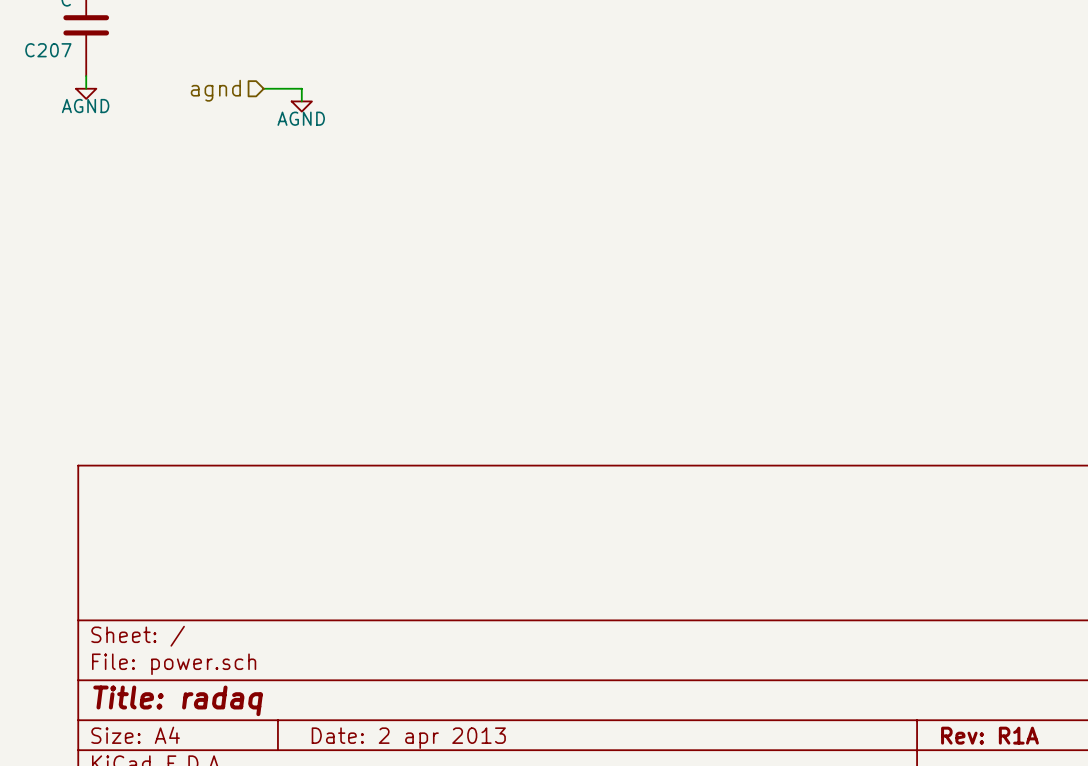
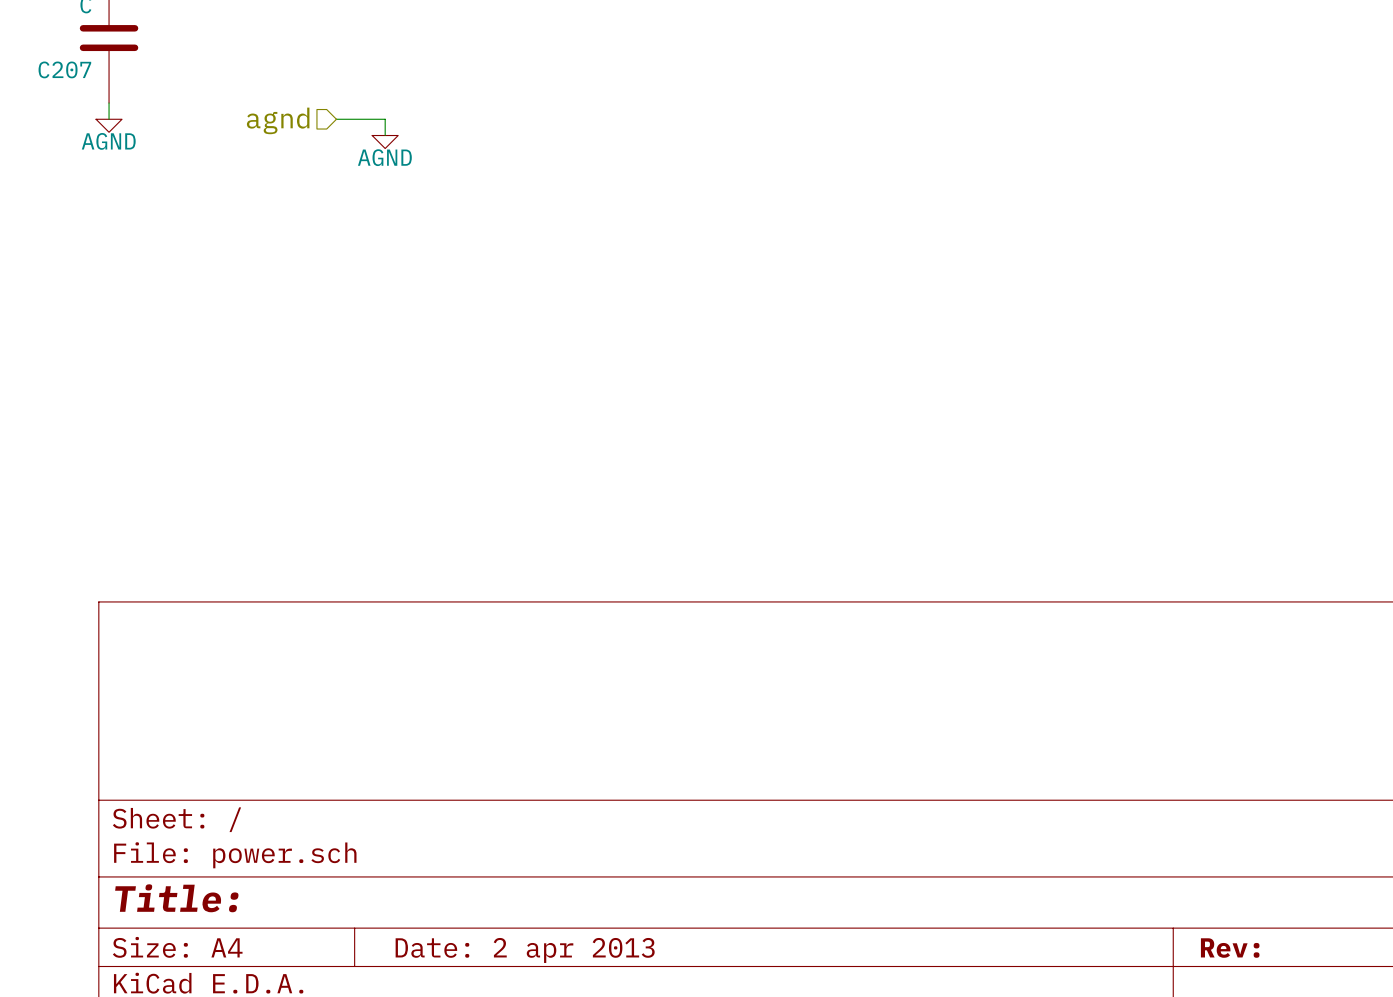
title block: Title: radaq (178, 700) -> Title: (176, 898)
title block: Rev: R1A (990, 735) -> Rev: (1230, 948)

